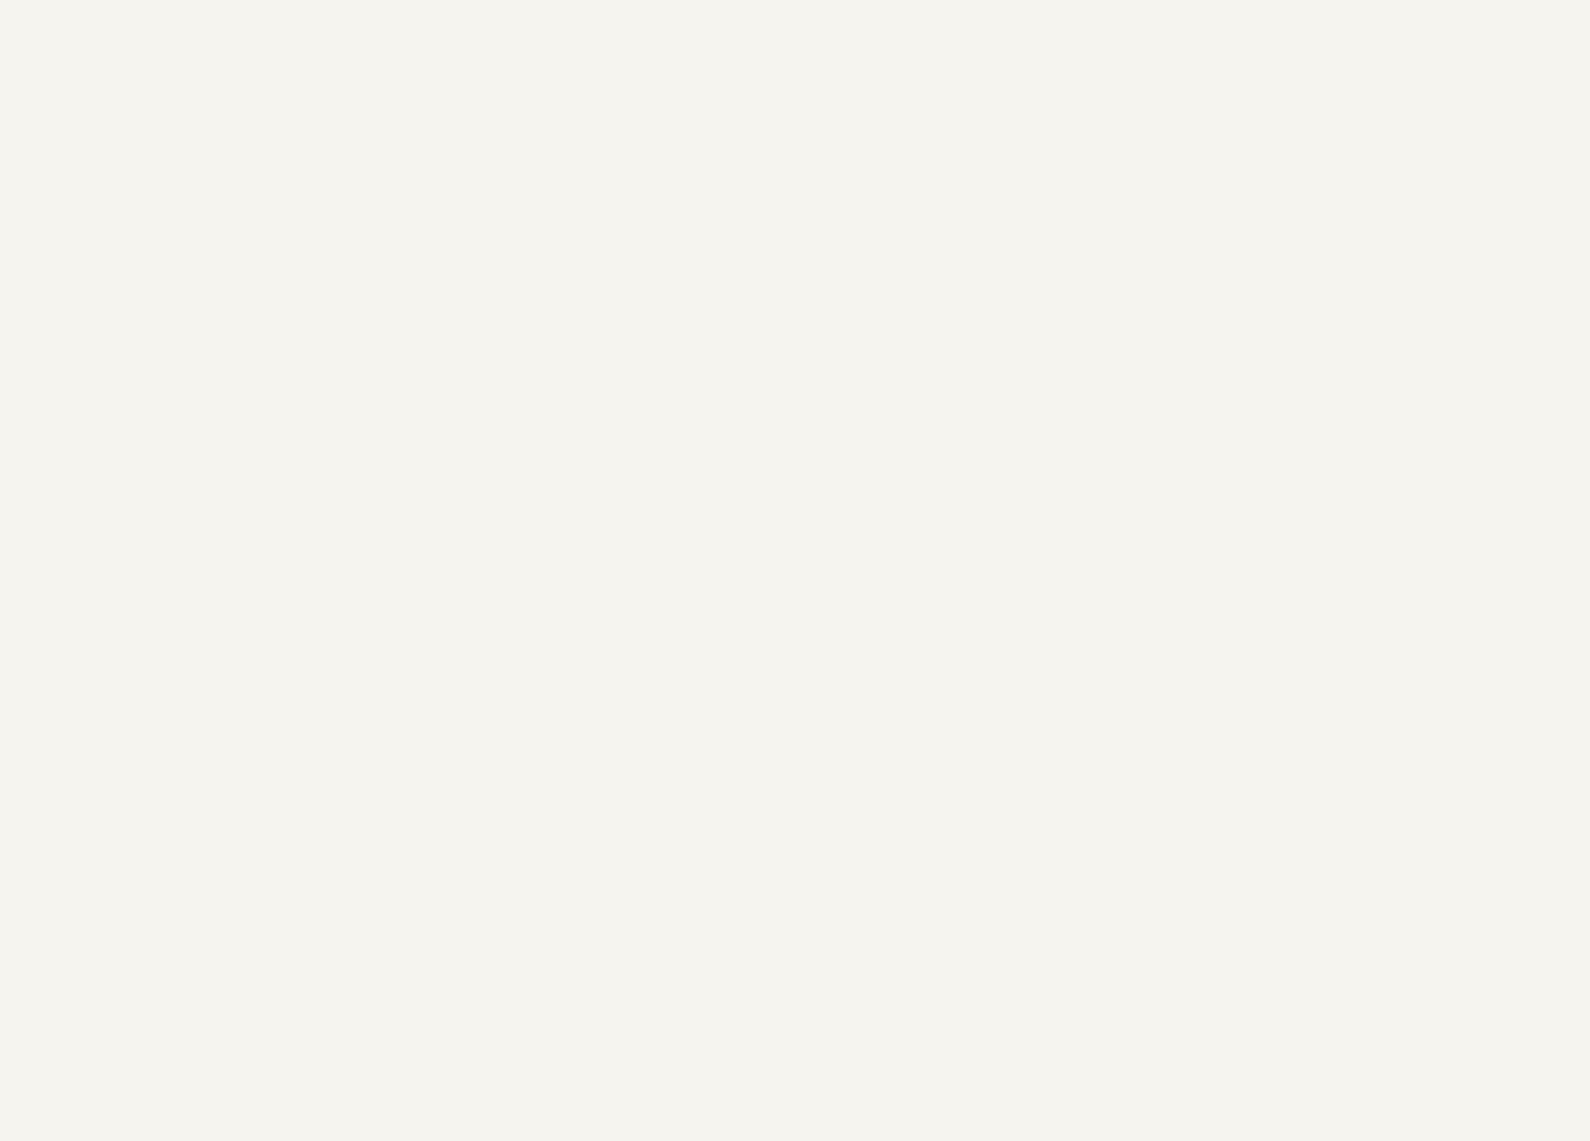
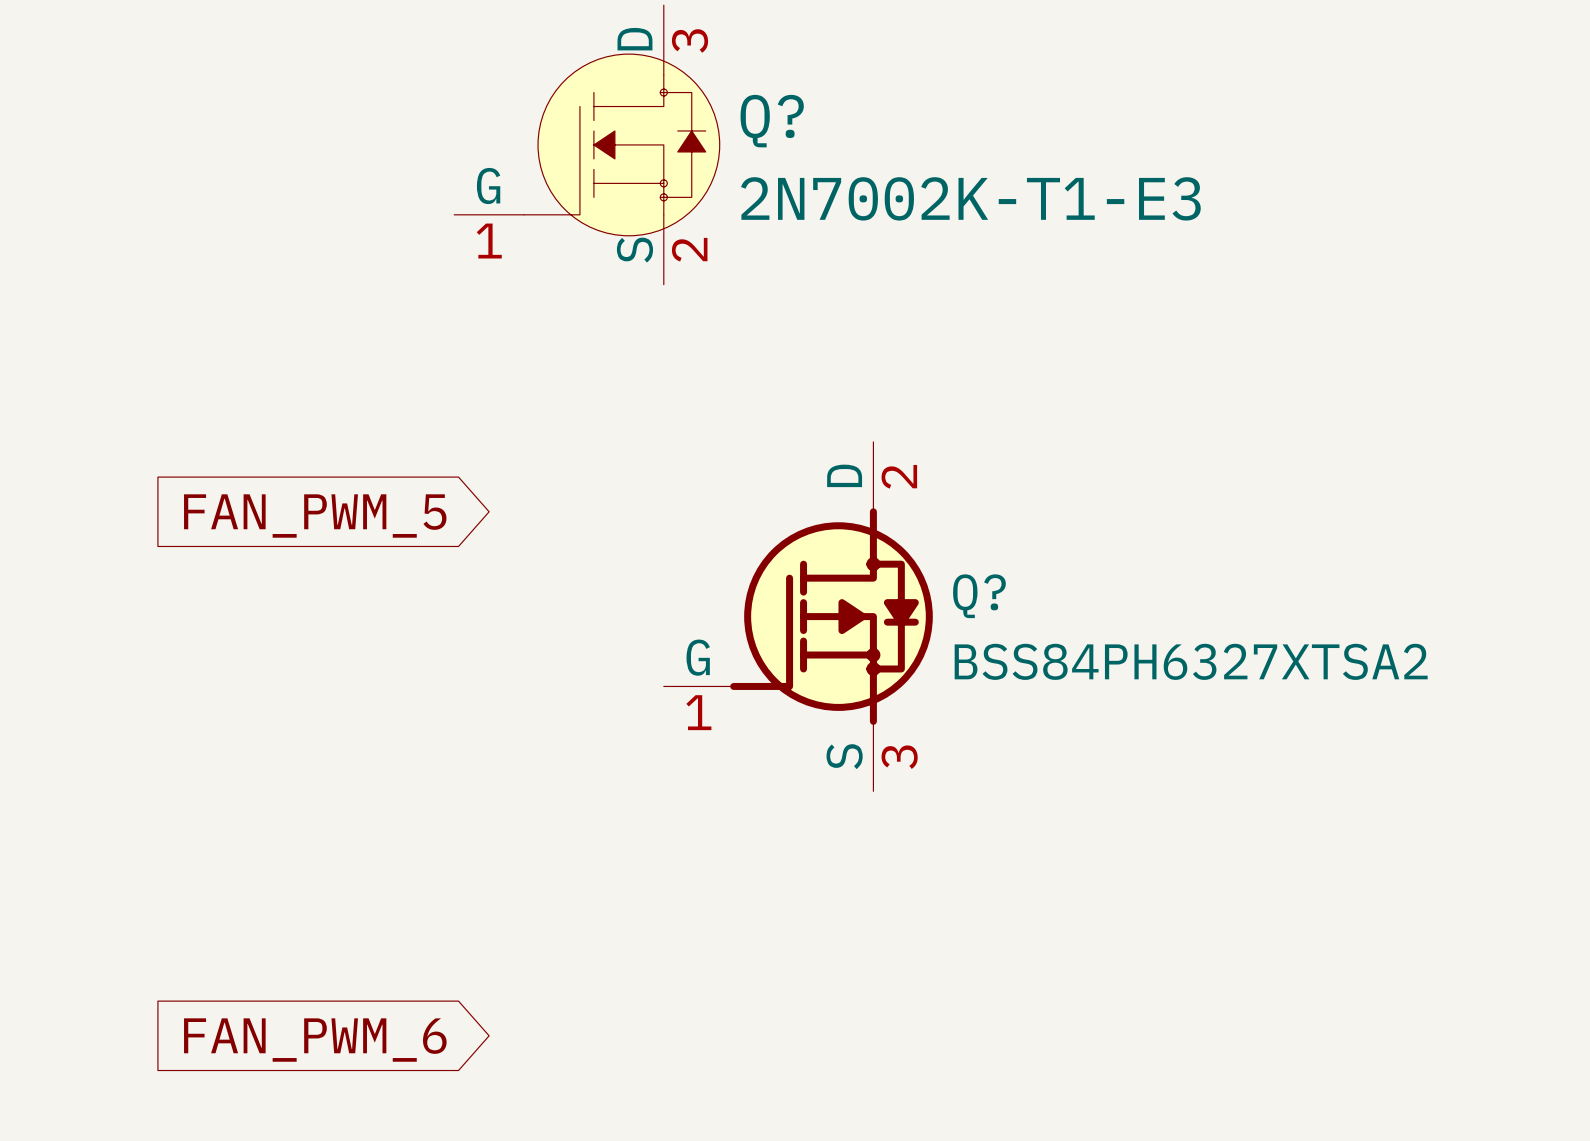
Q?: none -> 2N7002K-T1-E3 (586, 144)
global label: none -> FAN_PWM_5 (315, 516)
Q?: none -> (798, 616)
global label: none -> FAN_PWM_6 (315, 1040)

